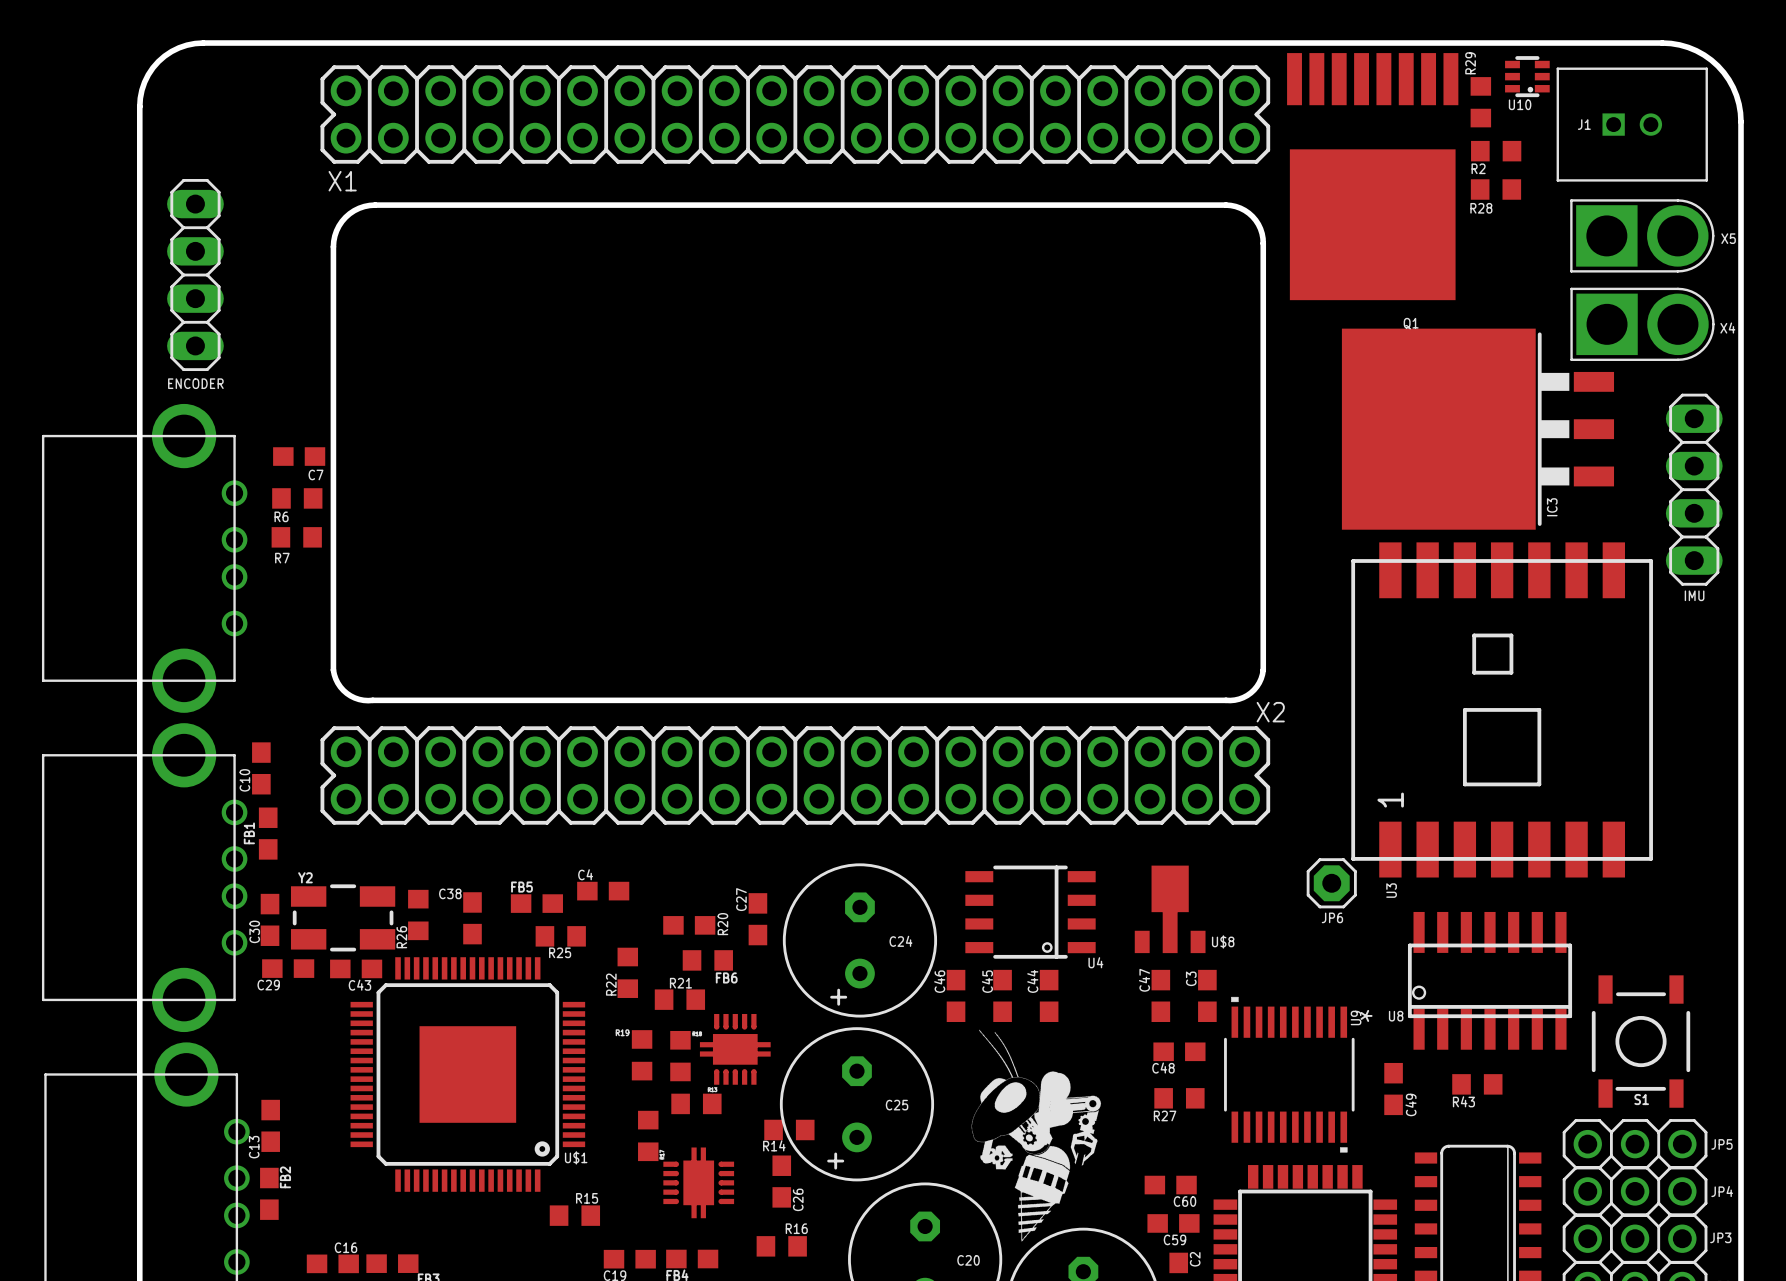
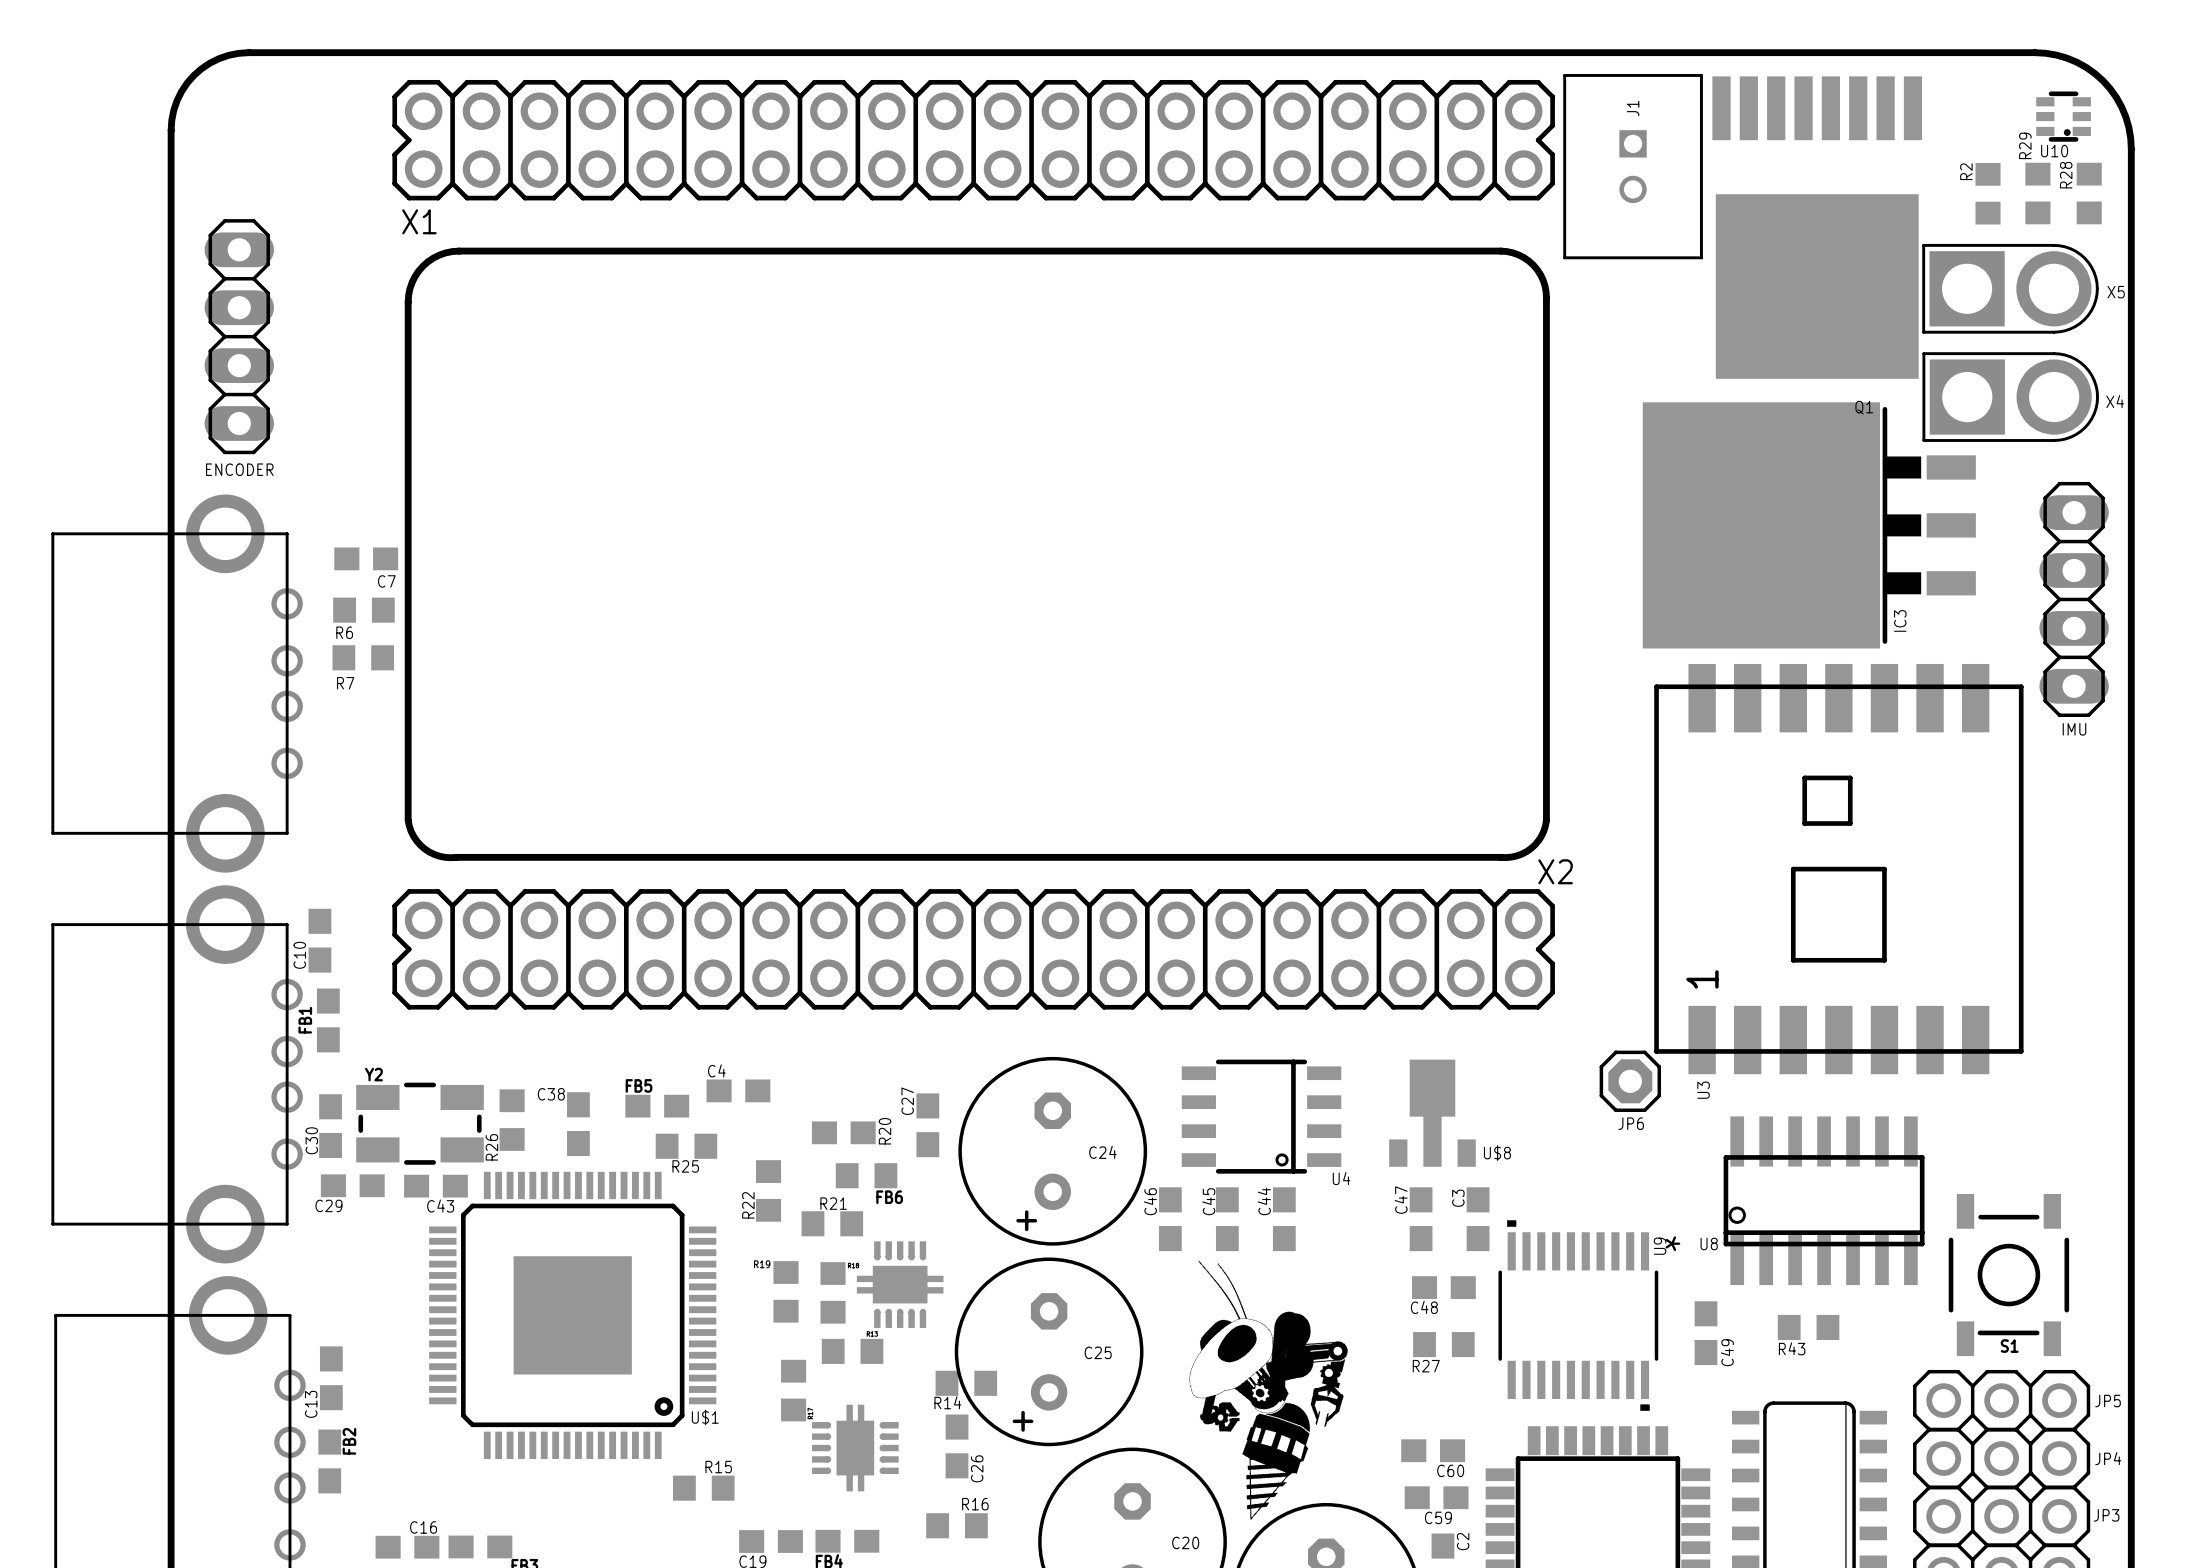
U10 position: (1527, 76) -> (2063, 116)
R29 position: (1480, 102) -> (2037, 193)
J1 rotation: 0° (1632, 124) -> 90° clockwise (1633, 166)
J1 position: (1632, 124) -> (1633, 166)
R2 rotation: 0° (1496, 151) -> 90° clockwise (1988, 193)
R2 position: (1496, 151) -> (1988, 193)
Q1 position: (1372, 176) -> (1817, 227)
R28 rotation: 0° (1495, 189) -> 90° clockwise (2089, 193)
R28 position: (1495, 189) -> (2089, 193)

